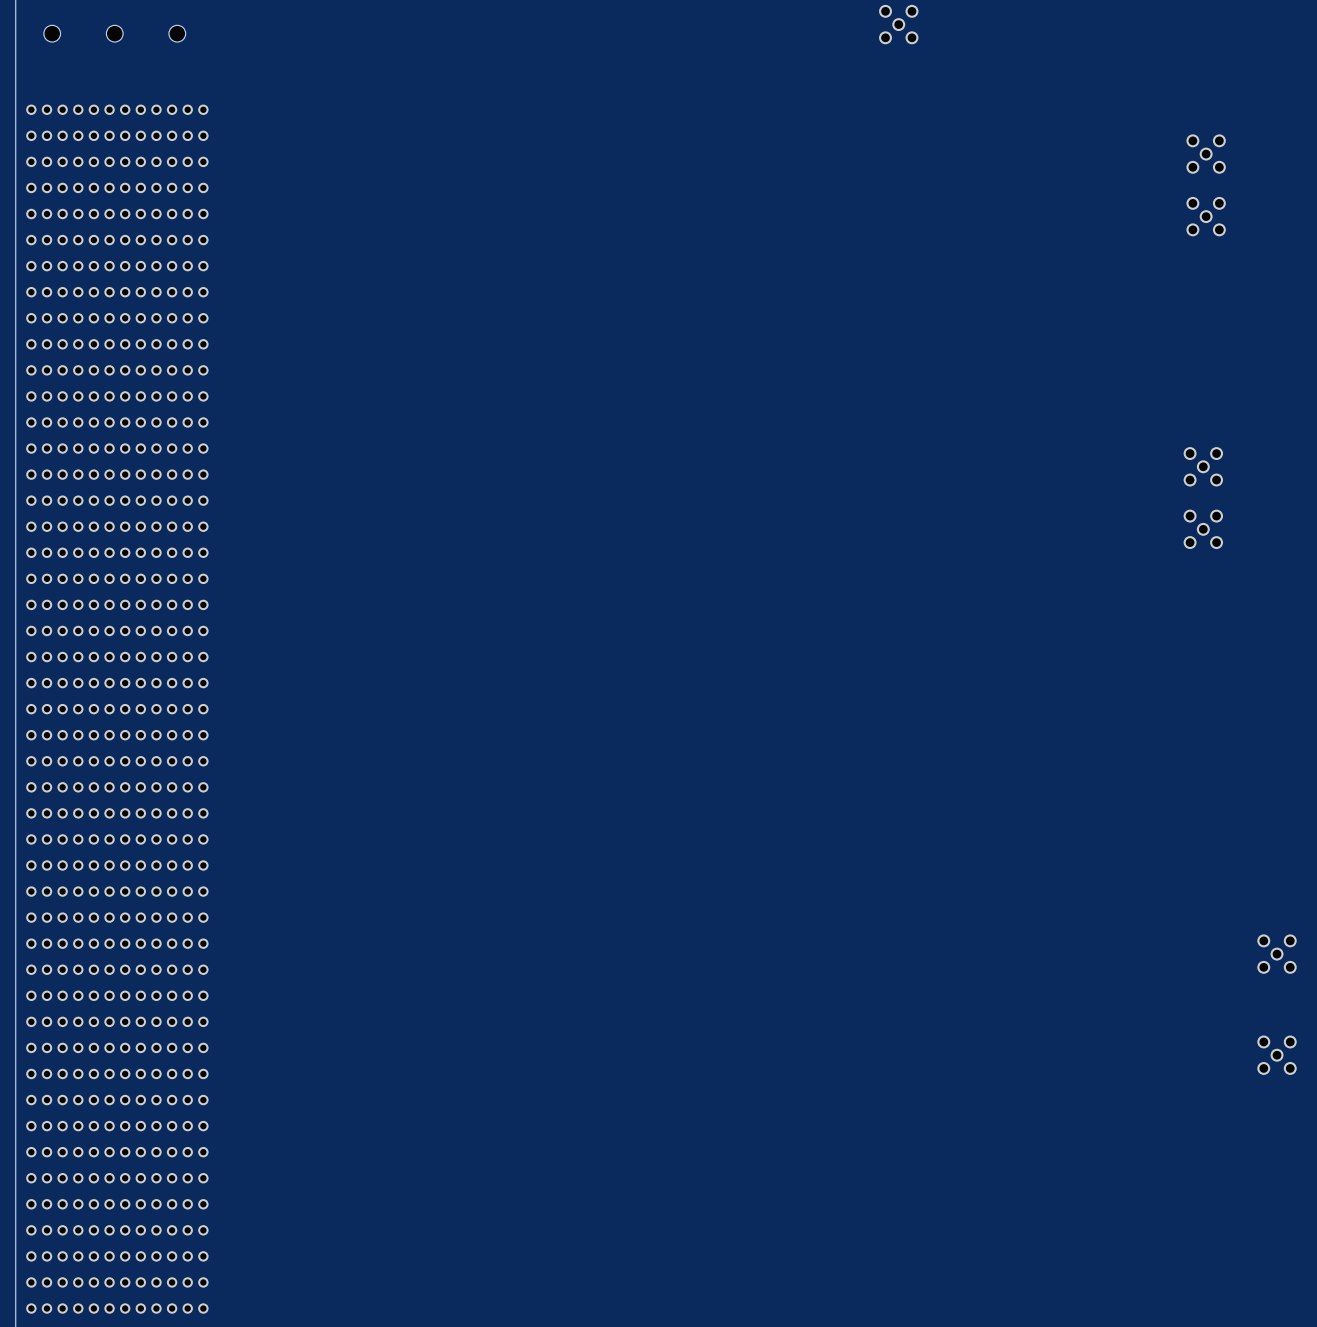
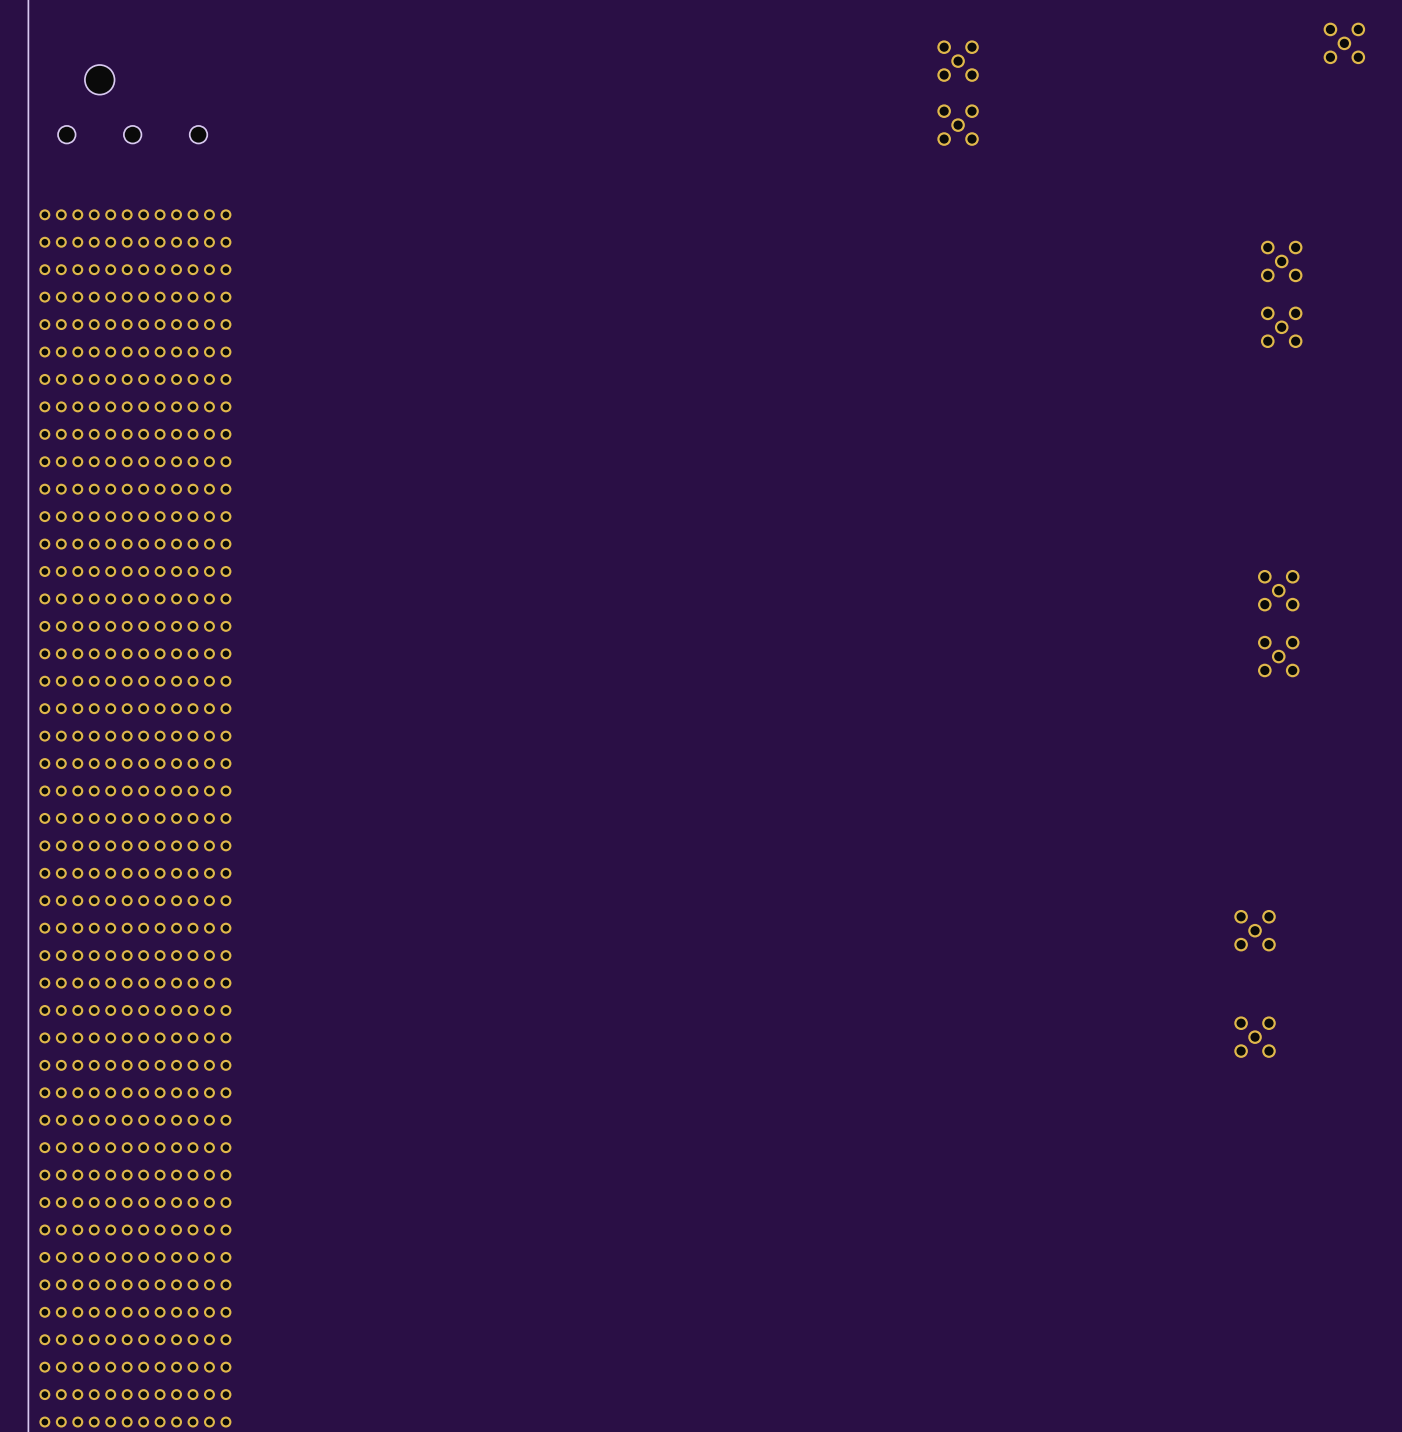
part: none -> (1255, 930)
part: none -> (1255, 1037)
part: (1277, 954) -> none
part: (1277, 1055) -> none

